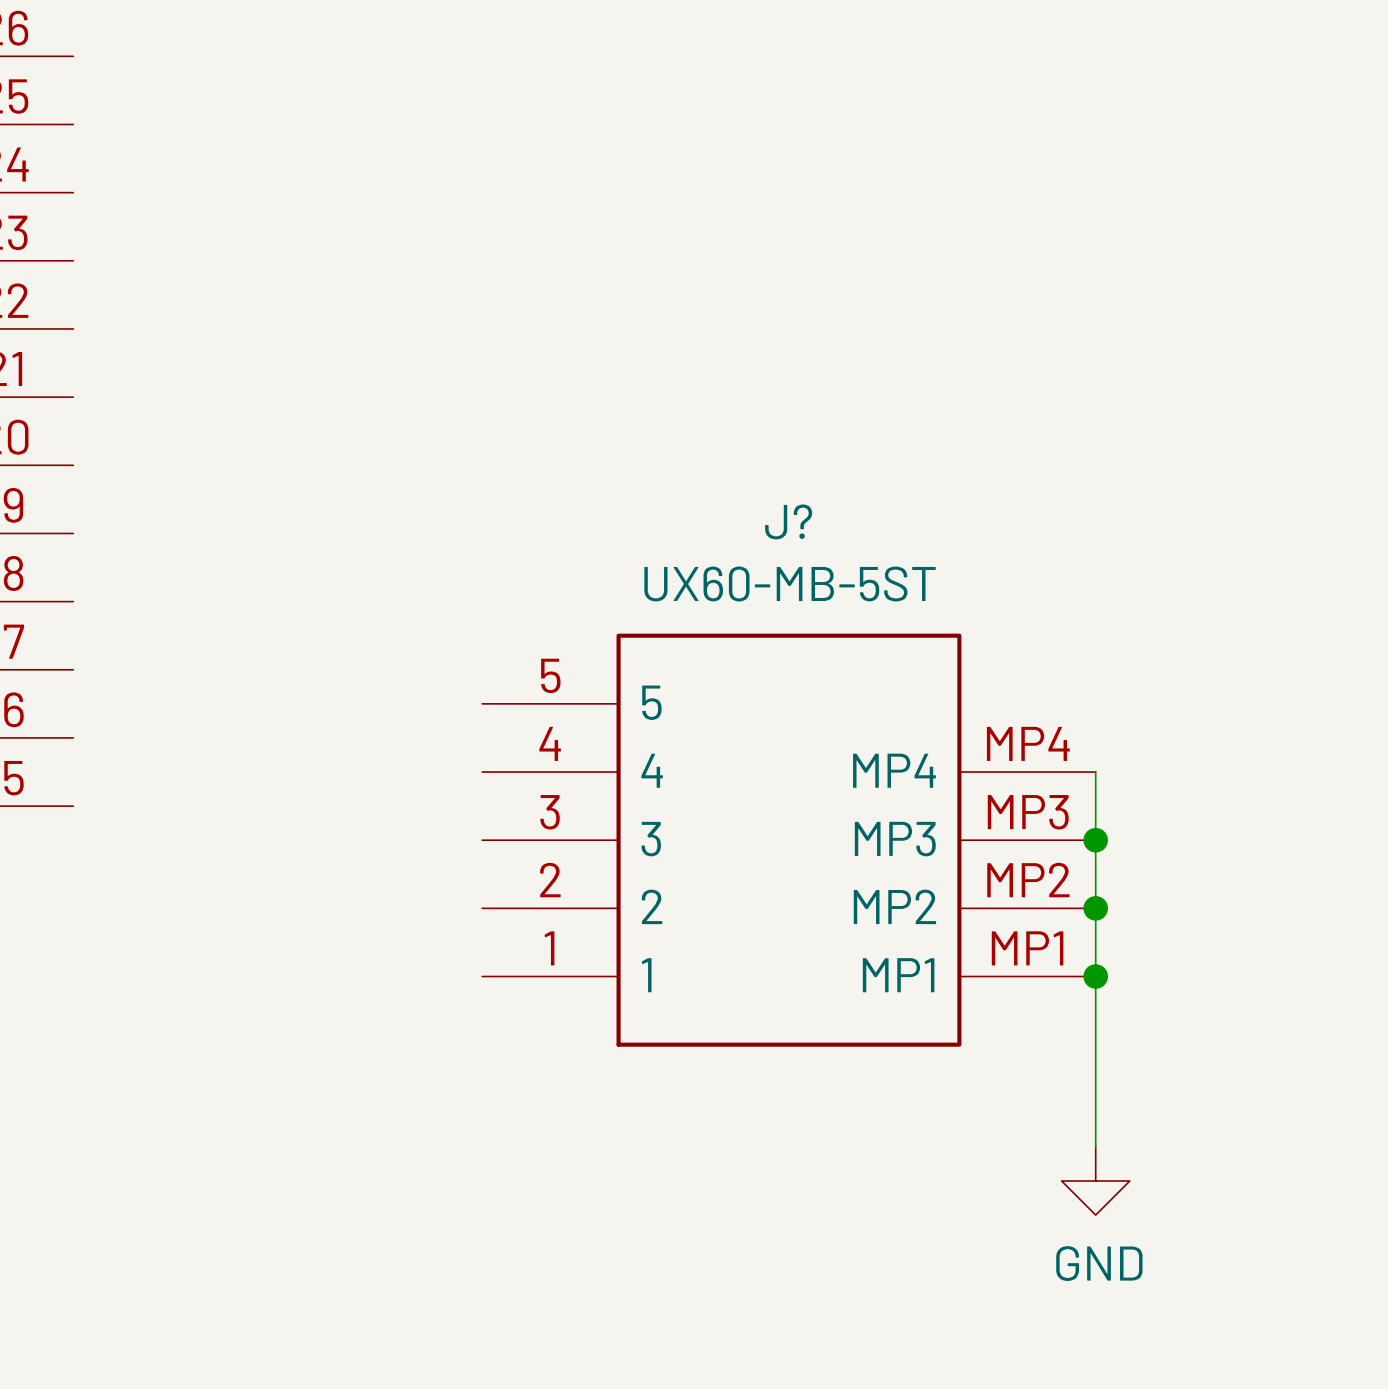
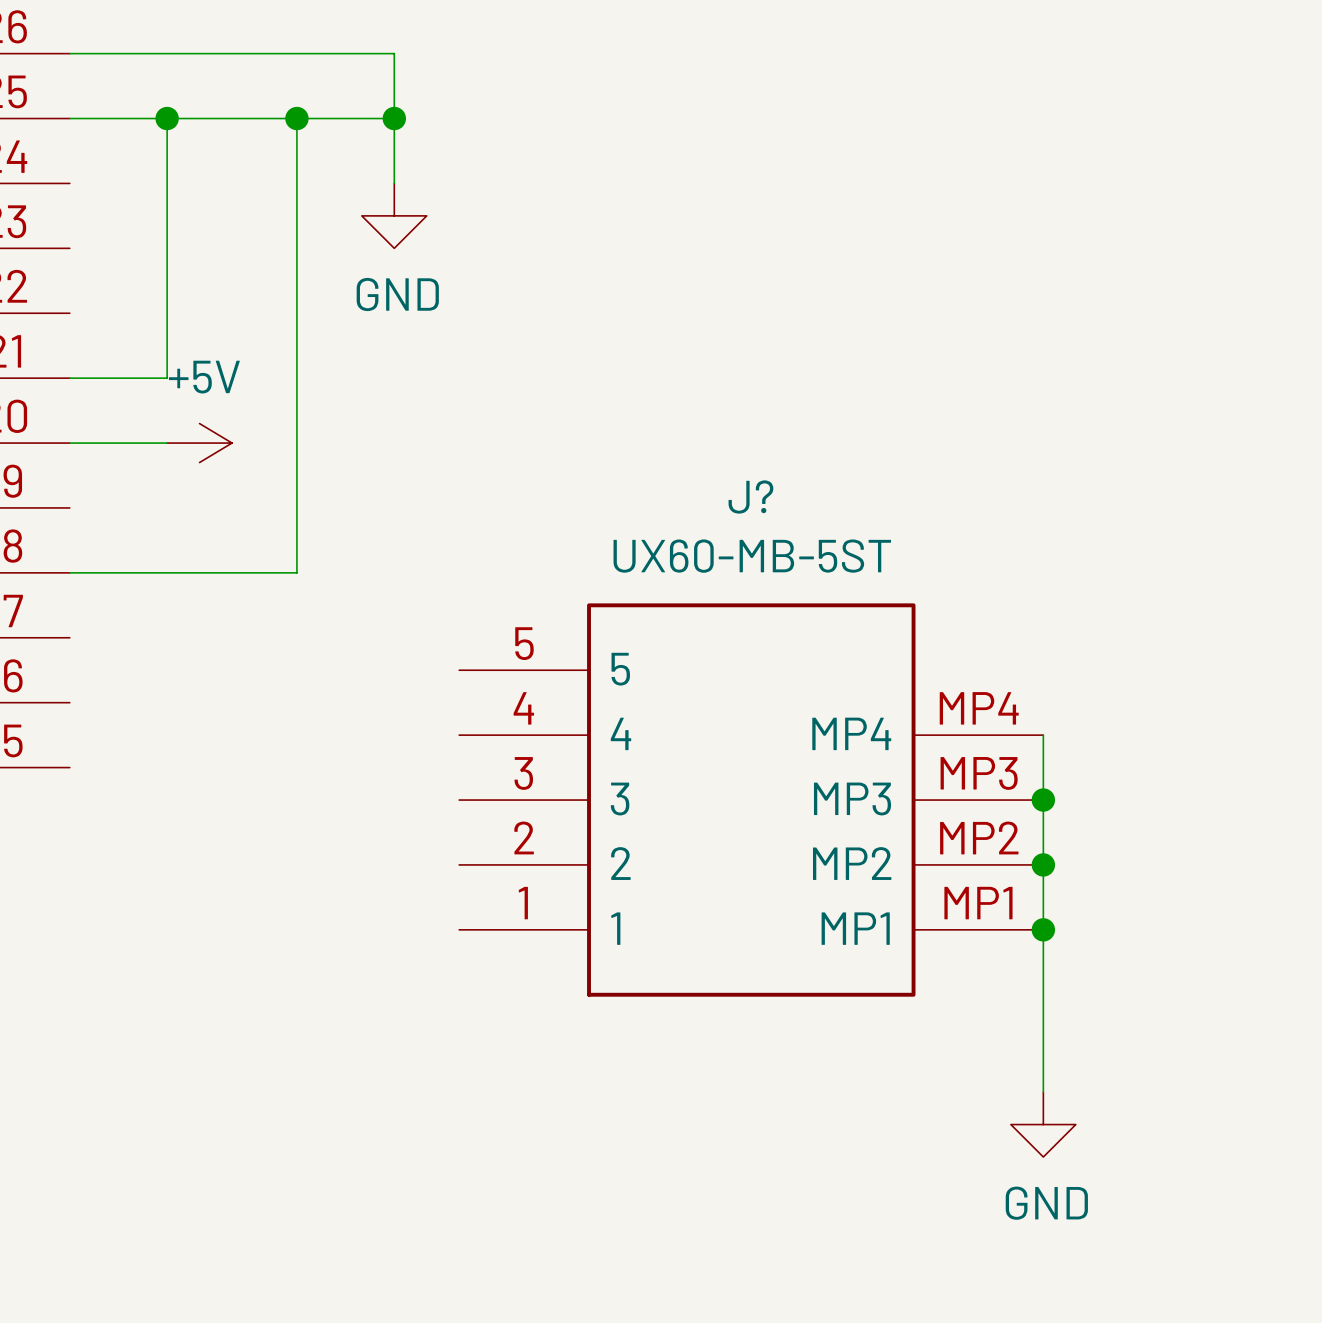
wire: none -> (69, 53) (394, 53) (394, 183)
wire: none -> (69, 118) (394, 118)
wire: none -> (167, 118) (167, 378) (69, 378)
junction: none -> (167, 118)
wire: none -> (296, 118) (296, 572) (69, 572)
junction: none -> (296, 118)
junction: none -> (394, 118)
power symbol: none -> GND (394, 215)
wire: none -> (69, 443) (167, 443)
power symbol: none -> +5V (199, 443)

